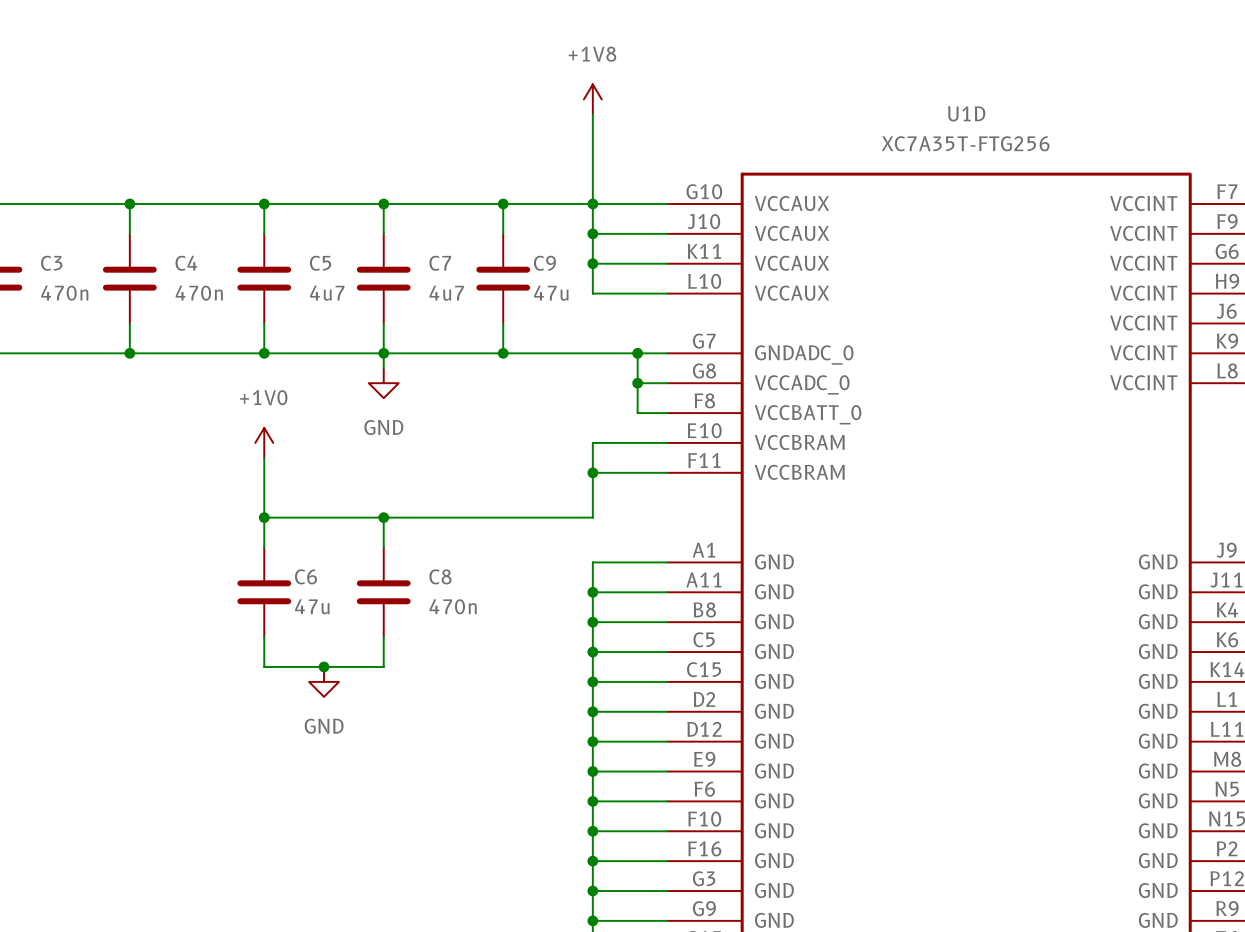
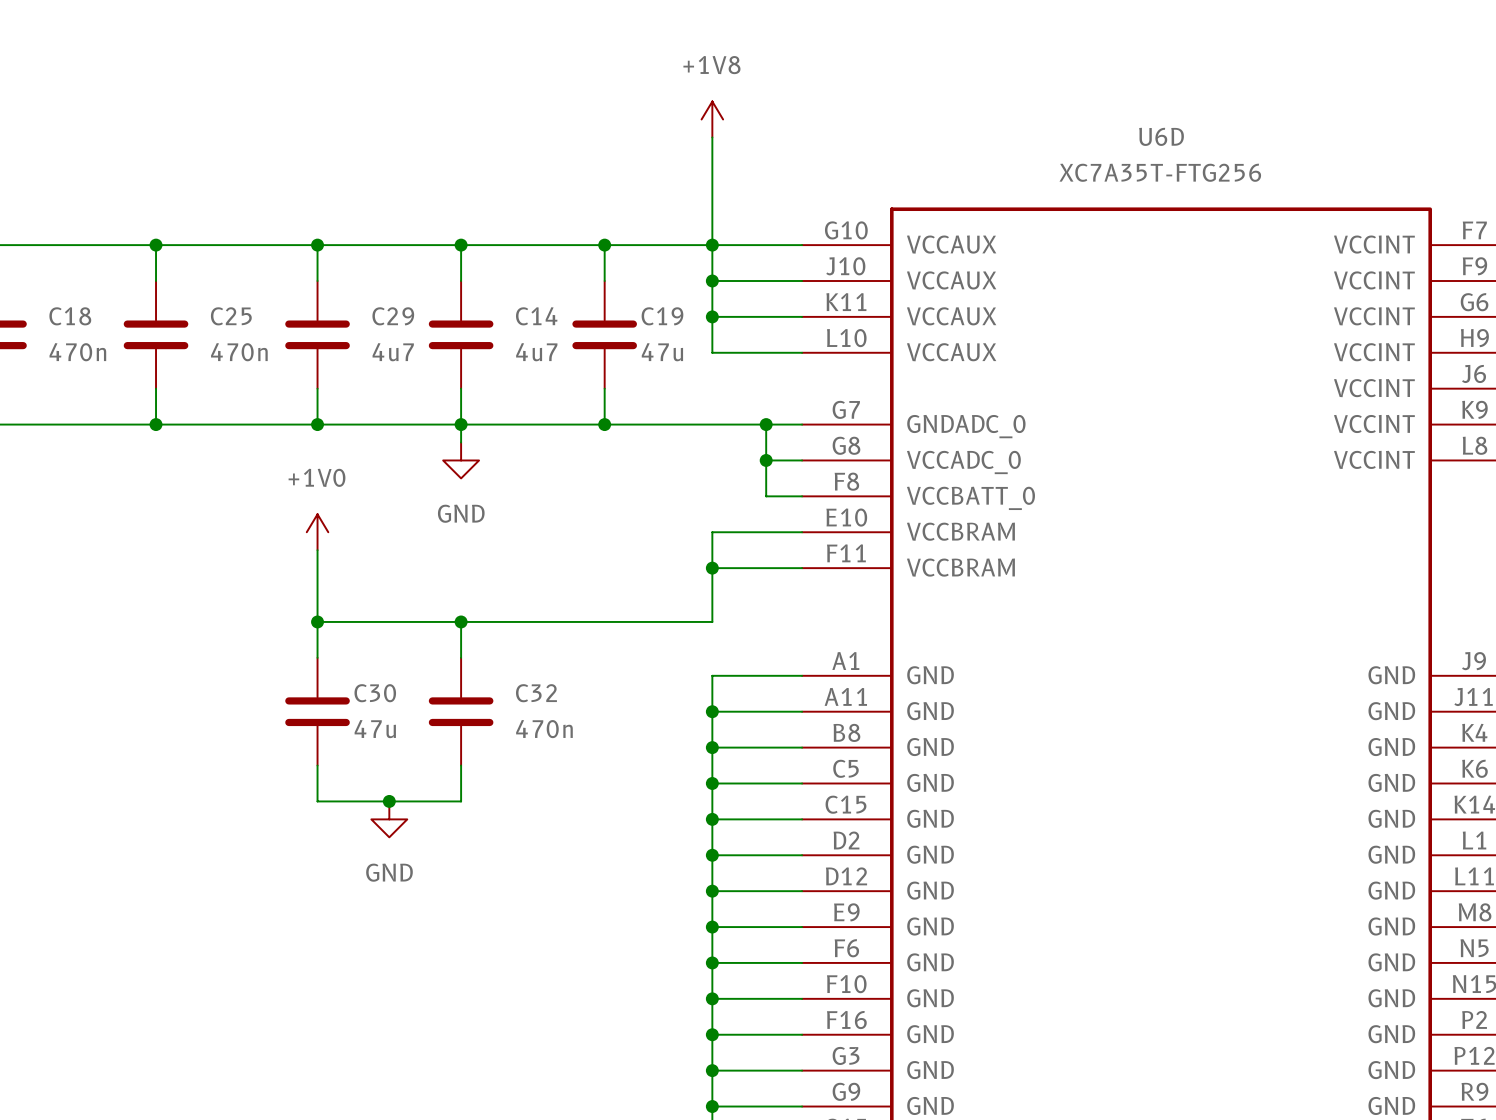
U1D name: U1D (966, 113) -> U6D (1161, 136)
C3 name: C3 (51, 263) -> C18 (70, 316)
C4 name: C4 (186, 263) -> C25 (231, 316)
C5 name: C5 (320, 263) -> C29 (393, 316)
C7 name: C7 (440, 263) -> C14 (536, 316)
C9 name: C9 (544, 263) -> C19 (662, 316)
C6 name: C6 (306, 576) -> C30 (375, 693)
C8 name: C8 (440, 576) -> C32 (536, 693)

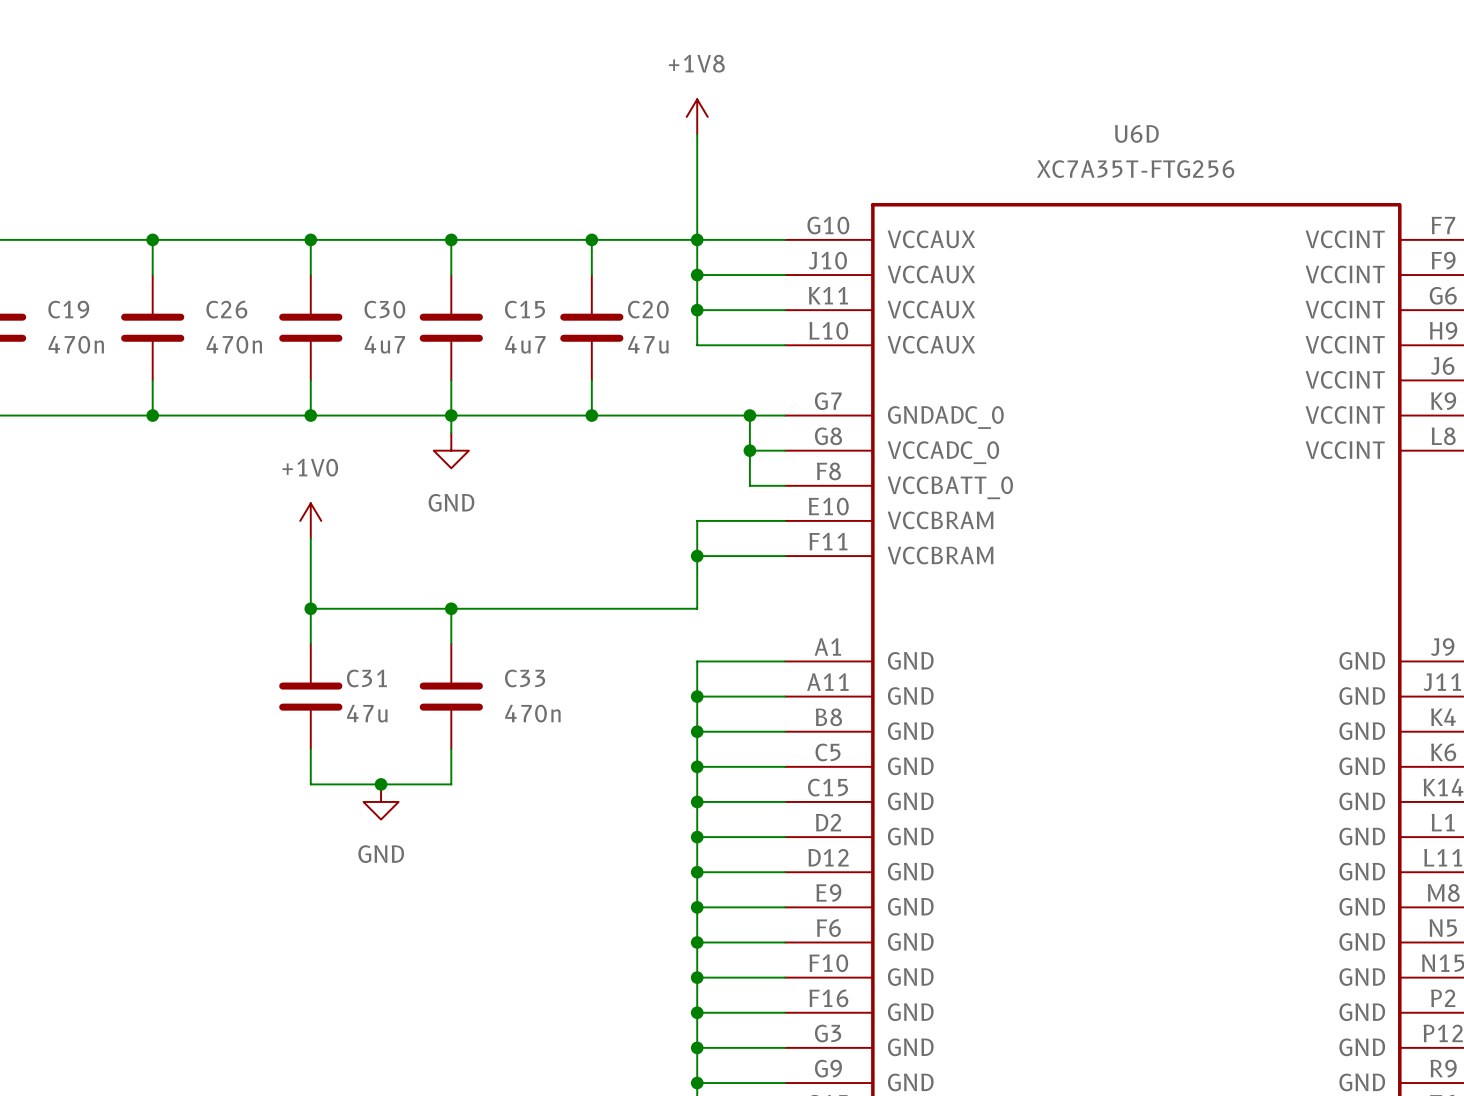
C18 name: C18 (70, 316) -> C19 (68, 309)
C25 name: C25 (231, 316) -> C26 (226, 309)
C29 name: C29 (393, 316) -> C30 (384, 309)
C14 name: C14 (536, 316) -> C15 (525, 309)
C19 name: C19 (662, 316) -> C20 (648, 309)
C30 name: C30 (375, 693) -> C31 (366, 678)
C32 name: C32 (536, 693) -> C33 (525, 678)

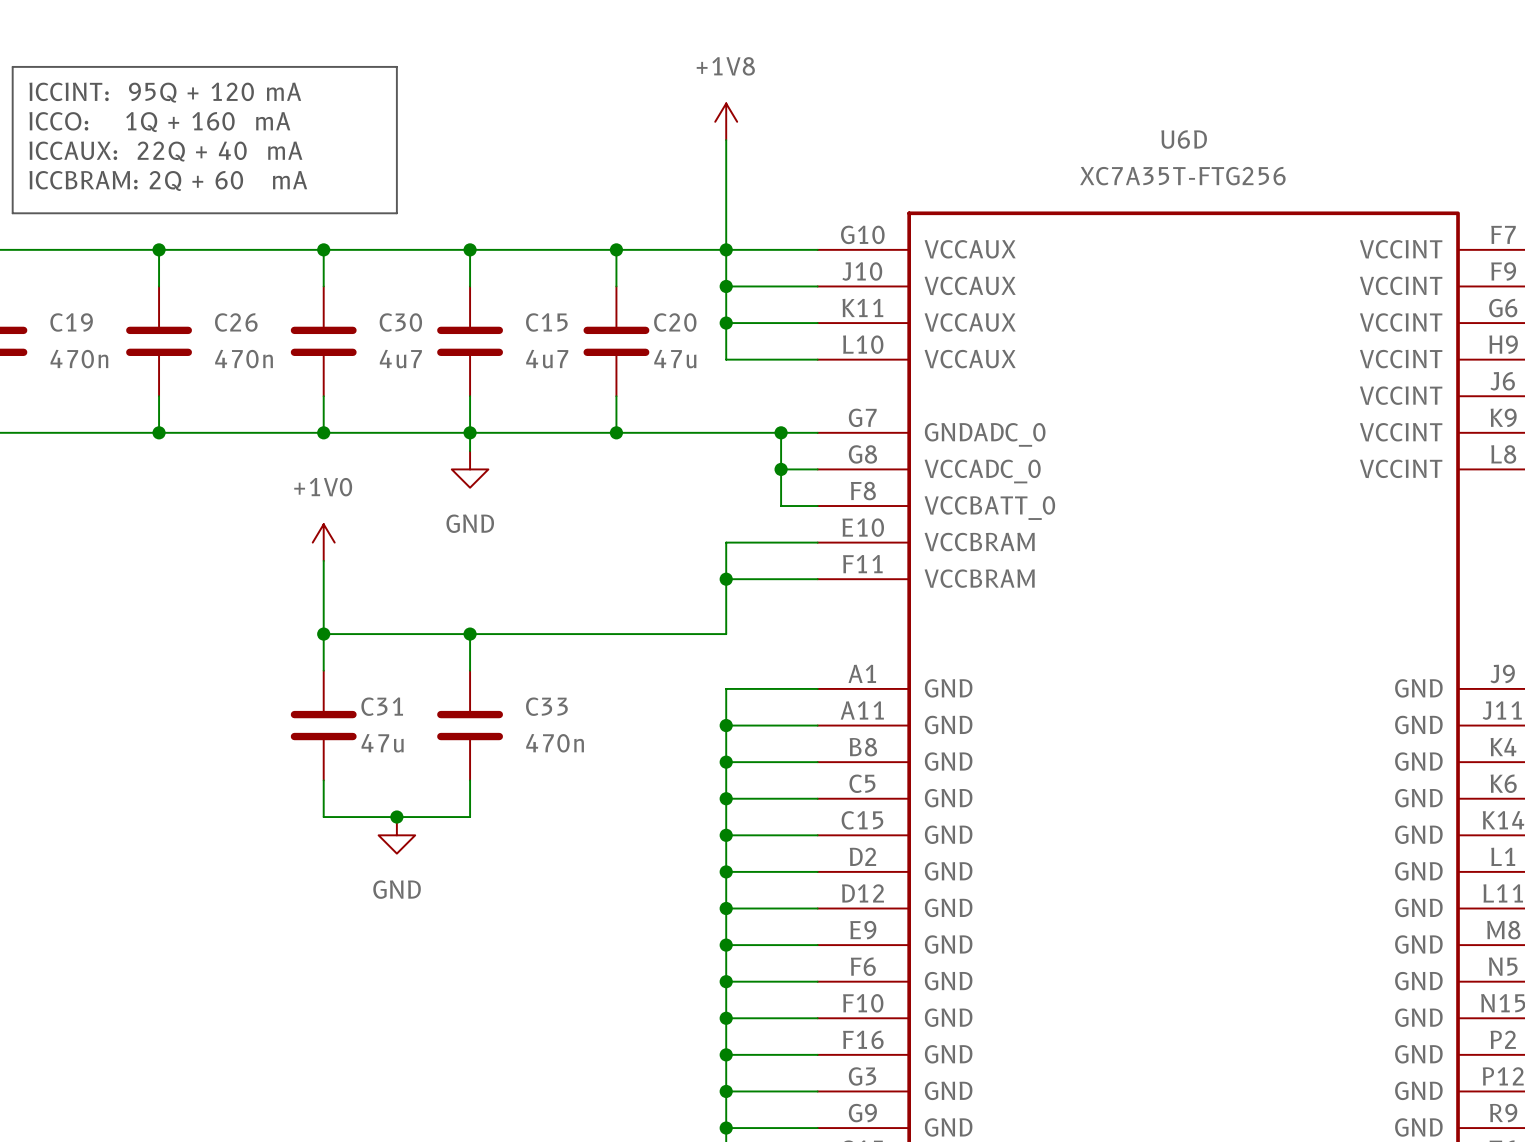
line: none -> (12, 66) (396, 66) (396, 213) (12, 213) (12, 66)
text: none -> ICCINT: 95Q + 120 mA (165, 92)
text: none -> ICCO: 1Q + 160 mA (159, 122)
text: none -> ICCAUX: 22Q + 40 mA (165, 151)
text: none -> ICCBRAM: 2Q + 60 mA (168, 181)

